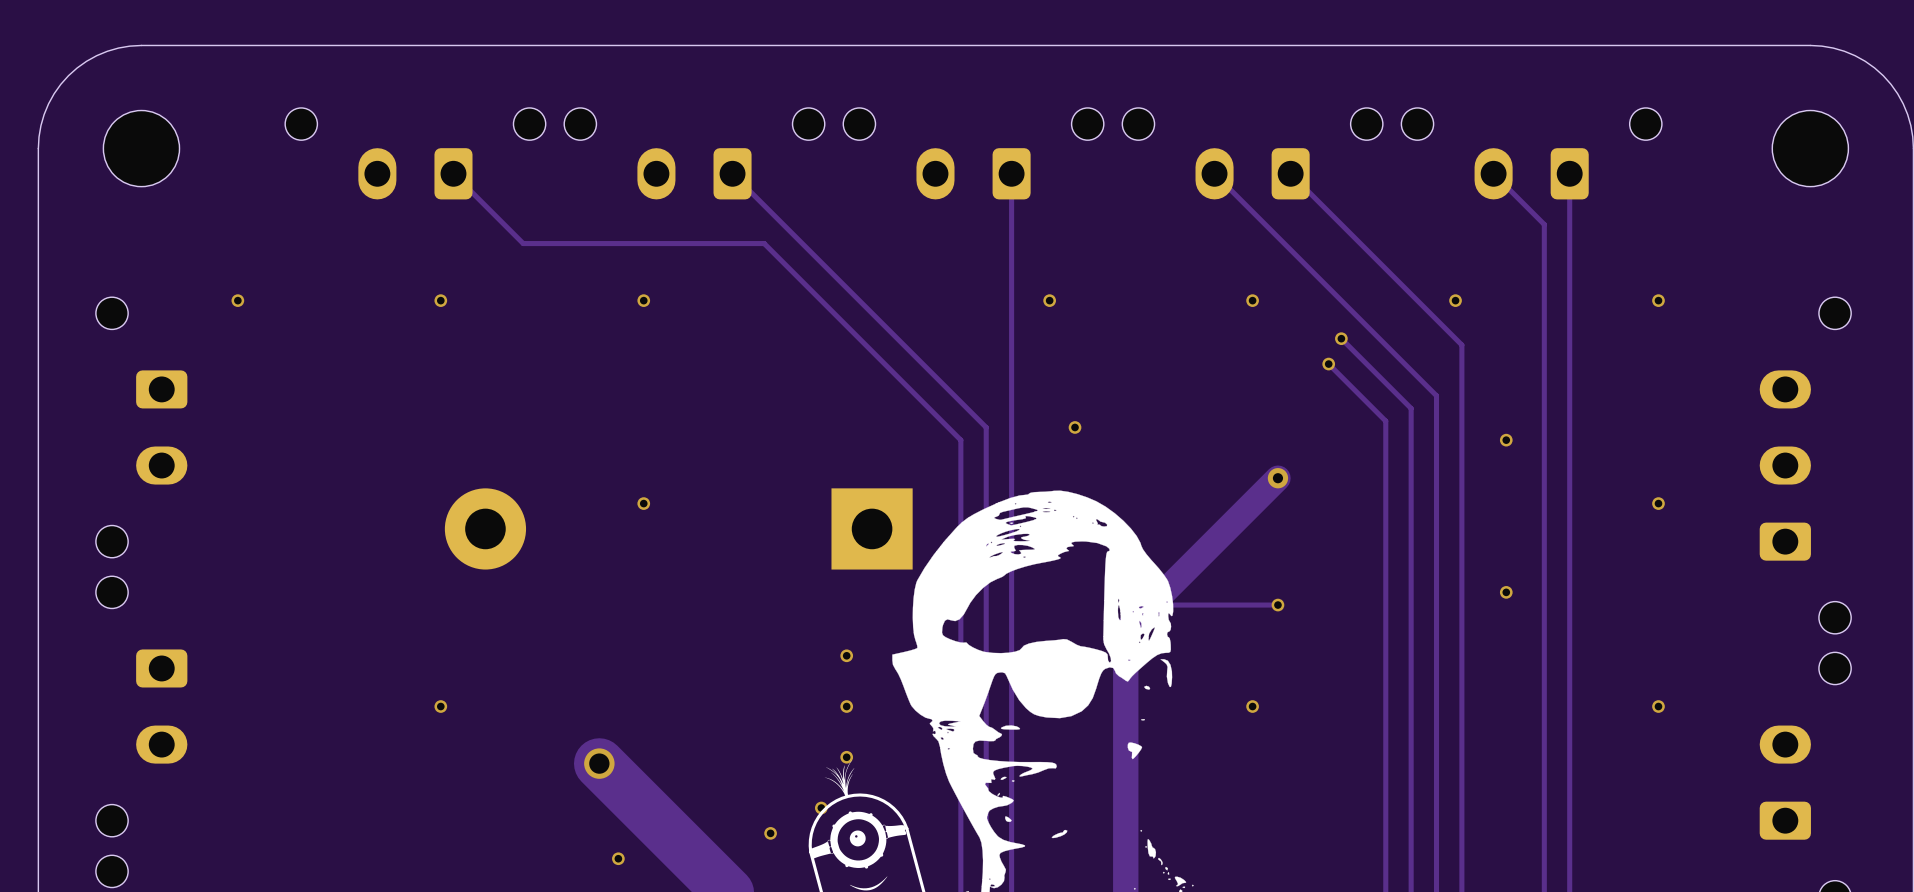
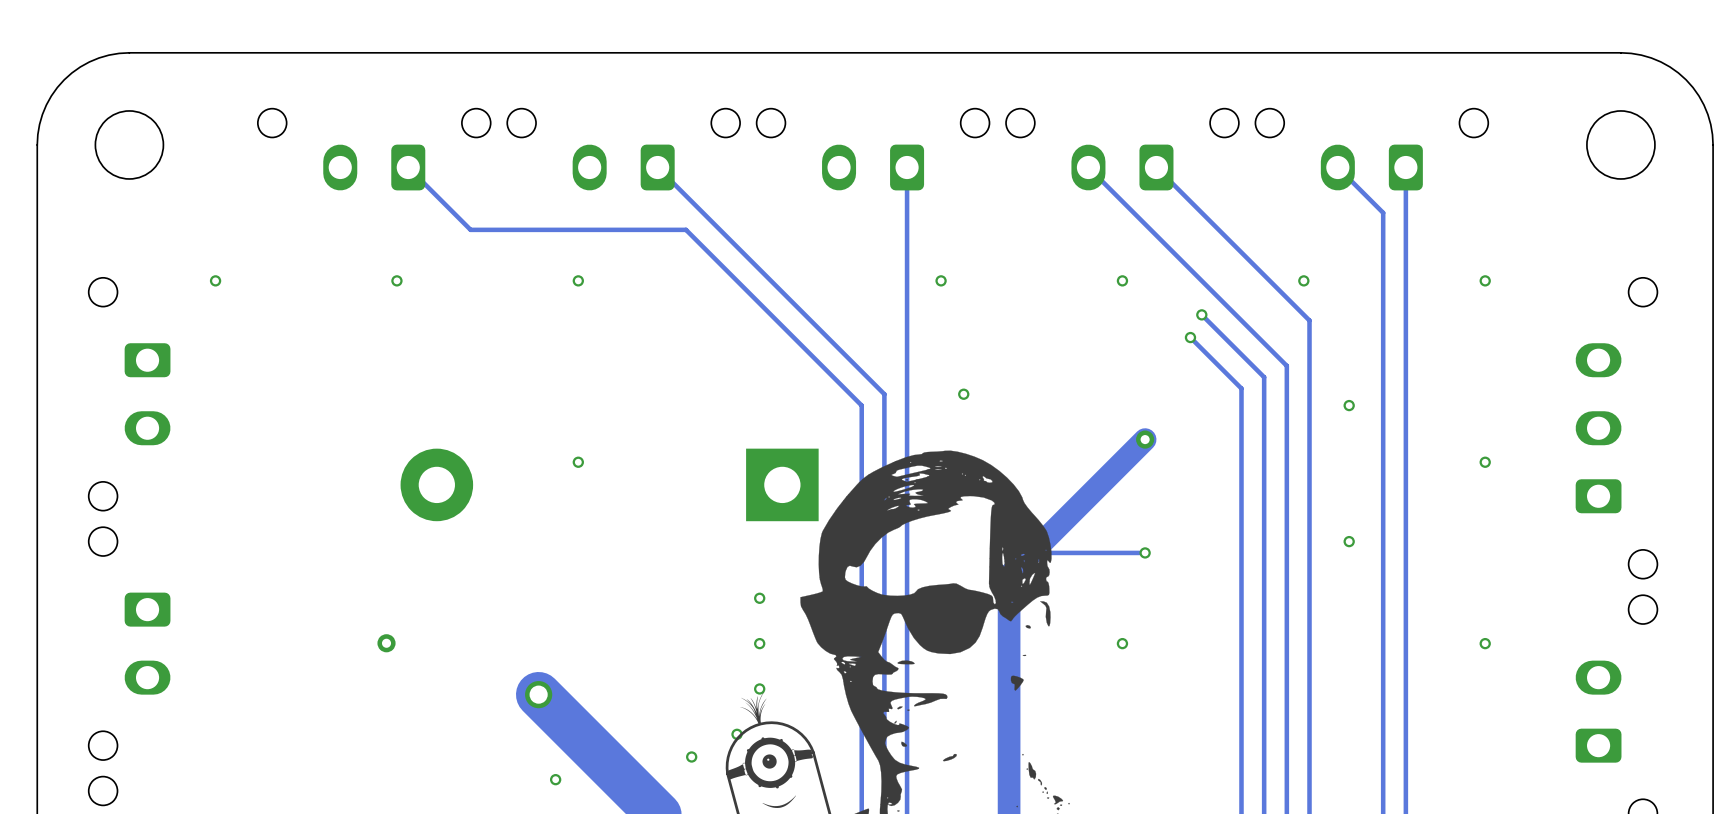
via size: [434, 700, 448, 713] -> [377, 634, 396, 653]

